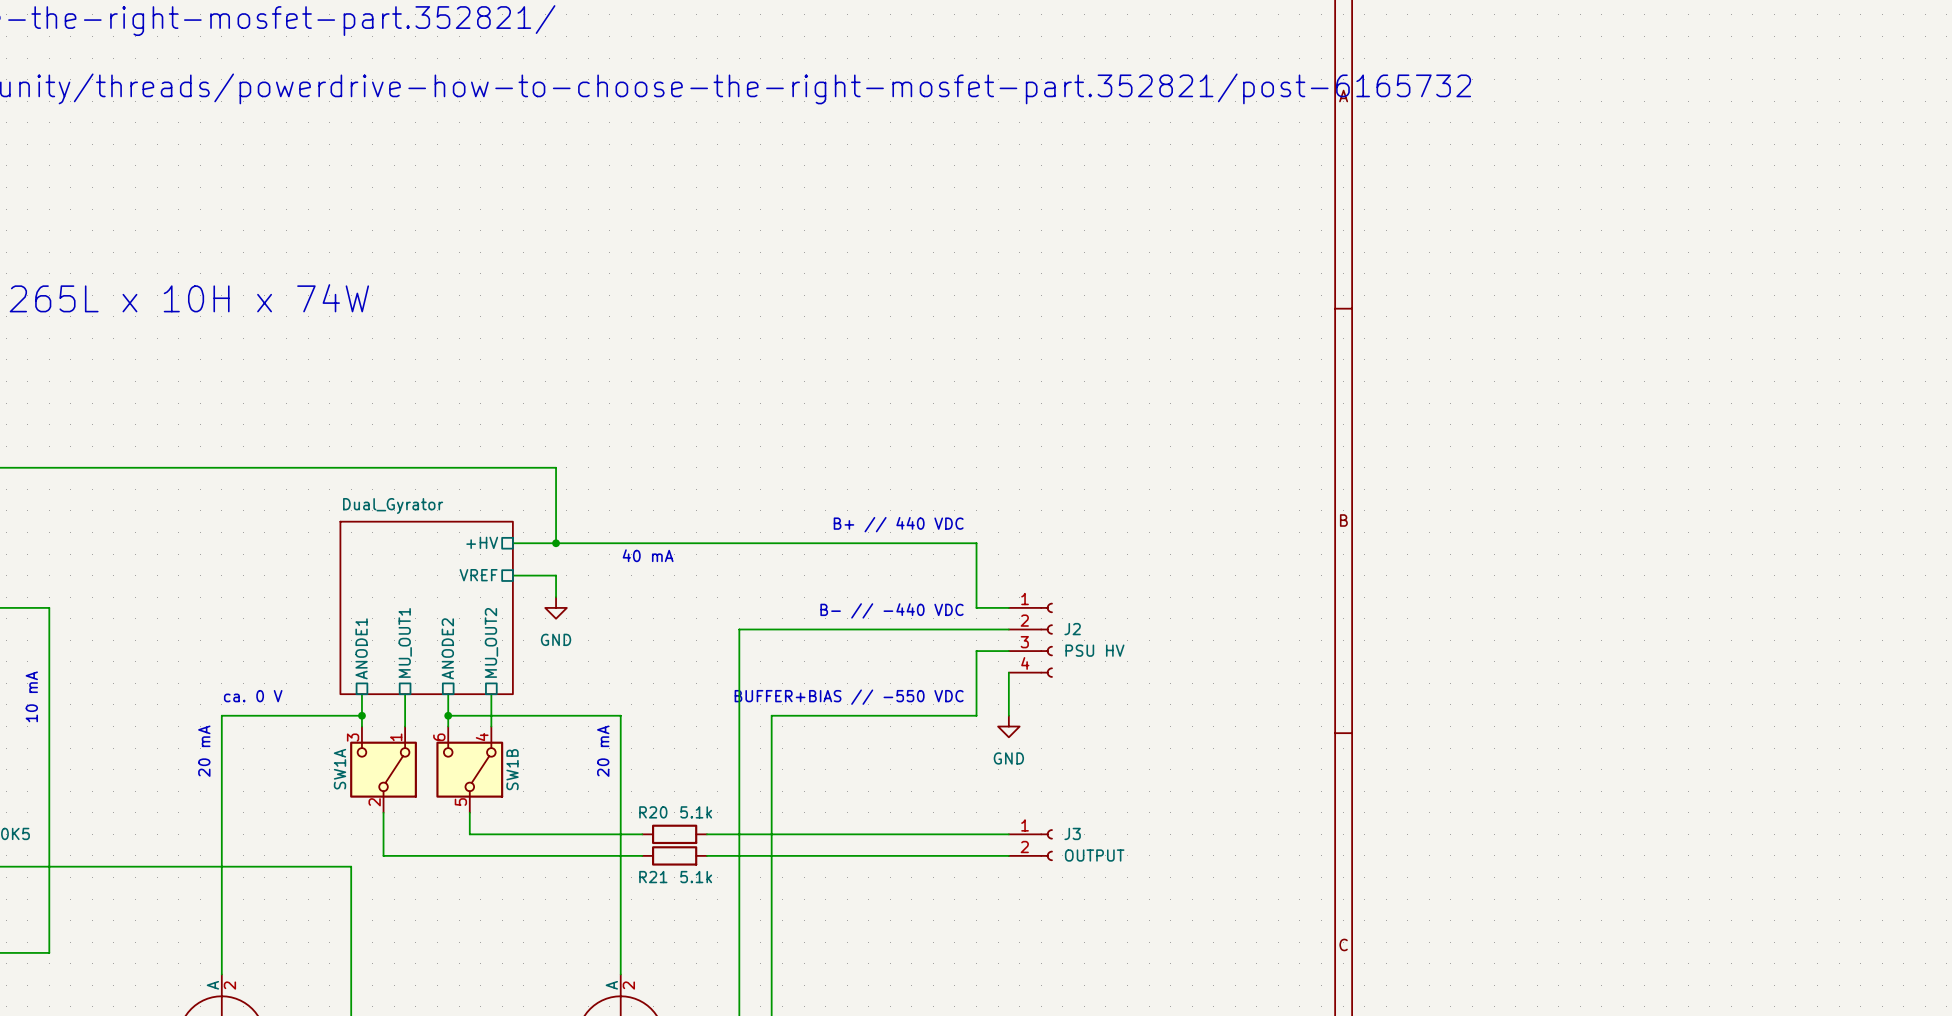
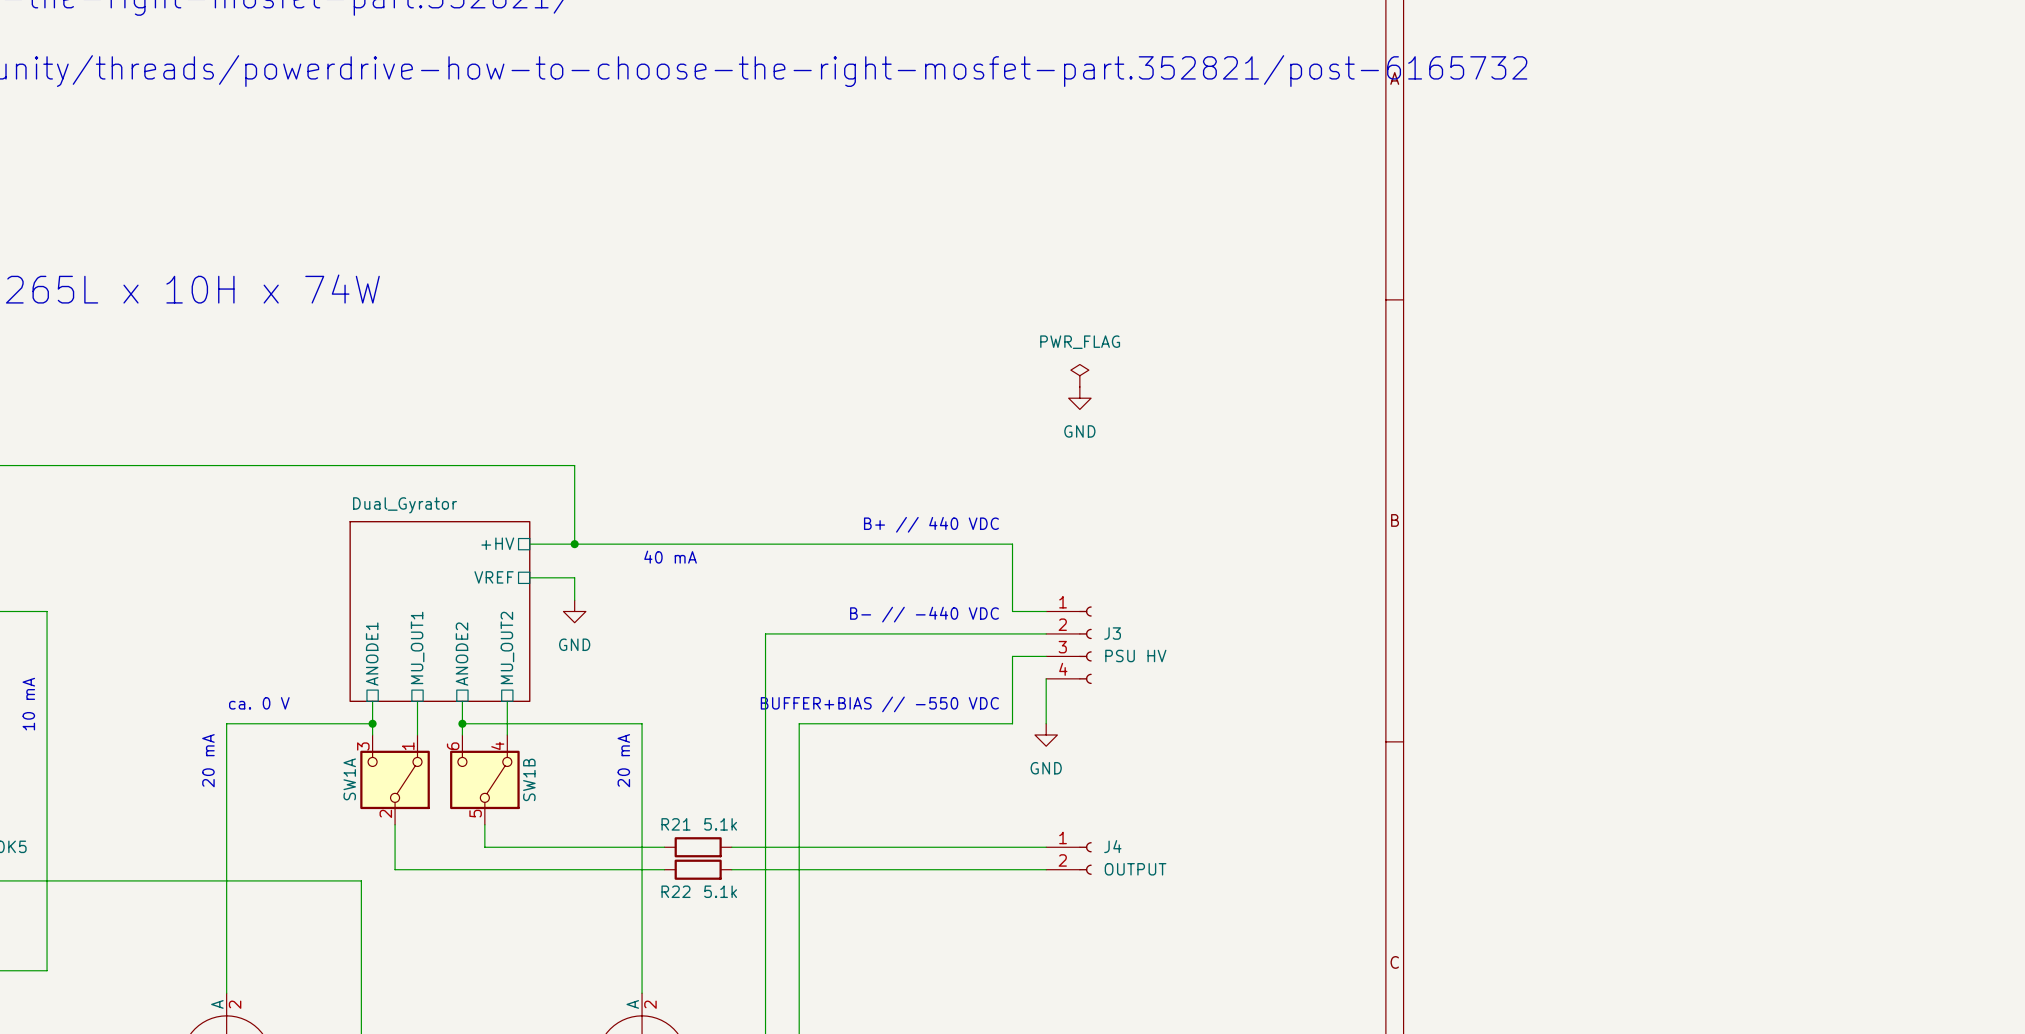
power symbol: none -> PWR_FLAG (1079, 375)
power symbol: none -> GND (1079, 398)
J2 name: J2 (1072, 629) -> J3 (1112, 633)
R20 name: R20 (653, 812) -> R21 (675, 824)
J3 name: J3 (1072, 833) -> J4 (1112, 846)
R21 name: R21 (653, 877) -> R22 (675, 891)

